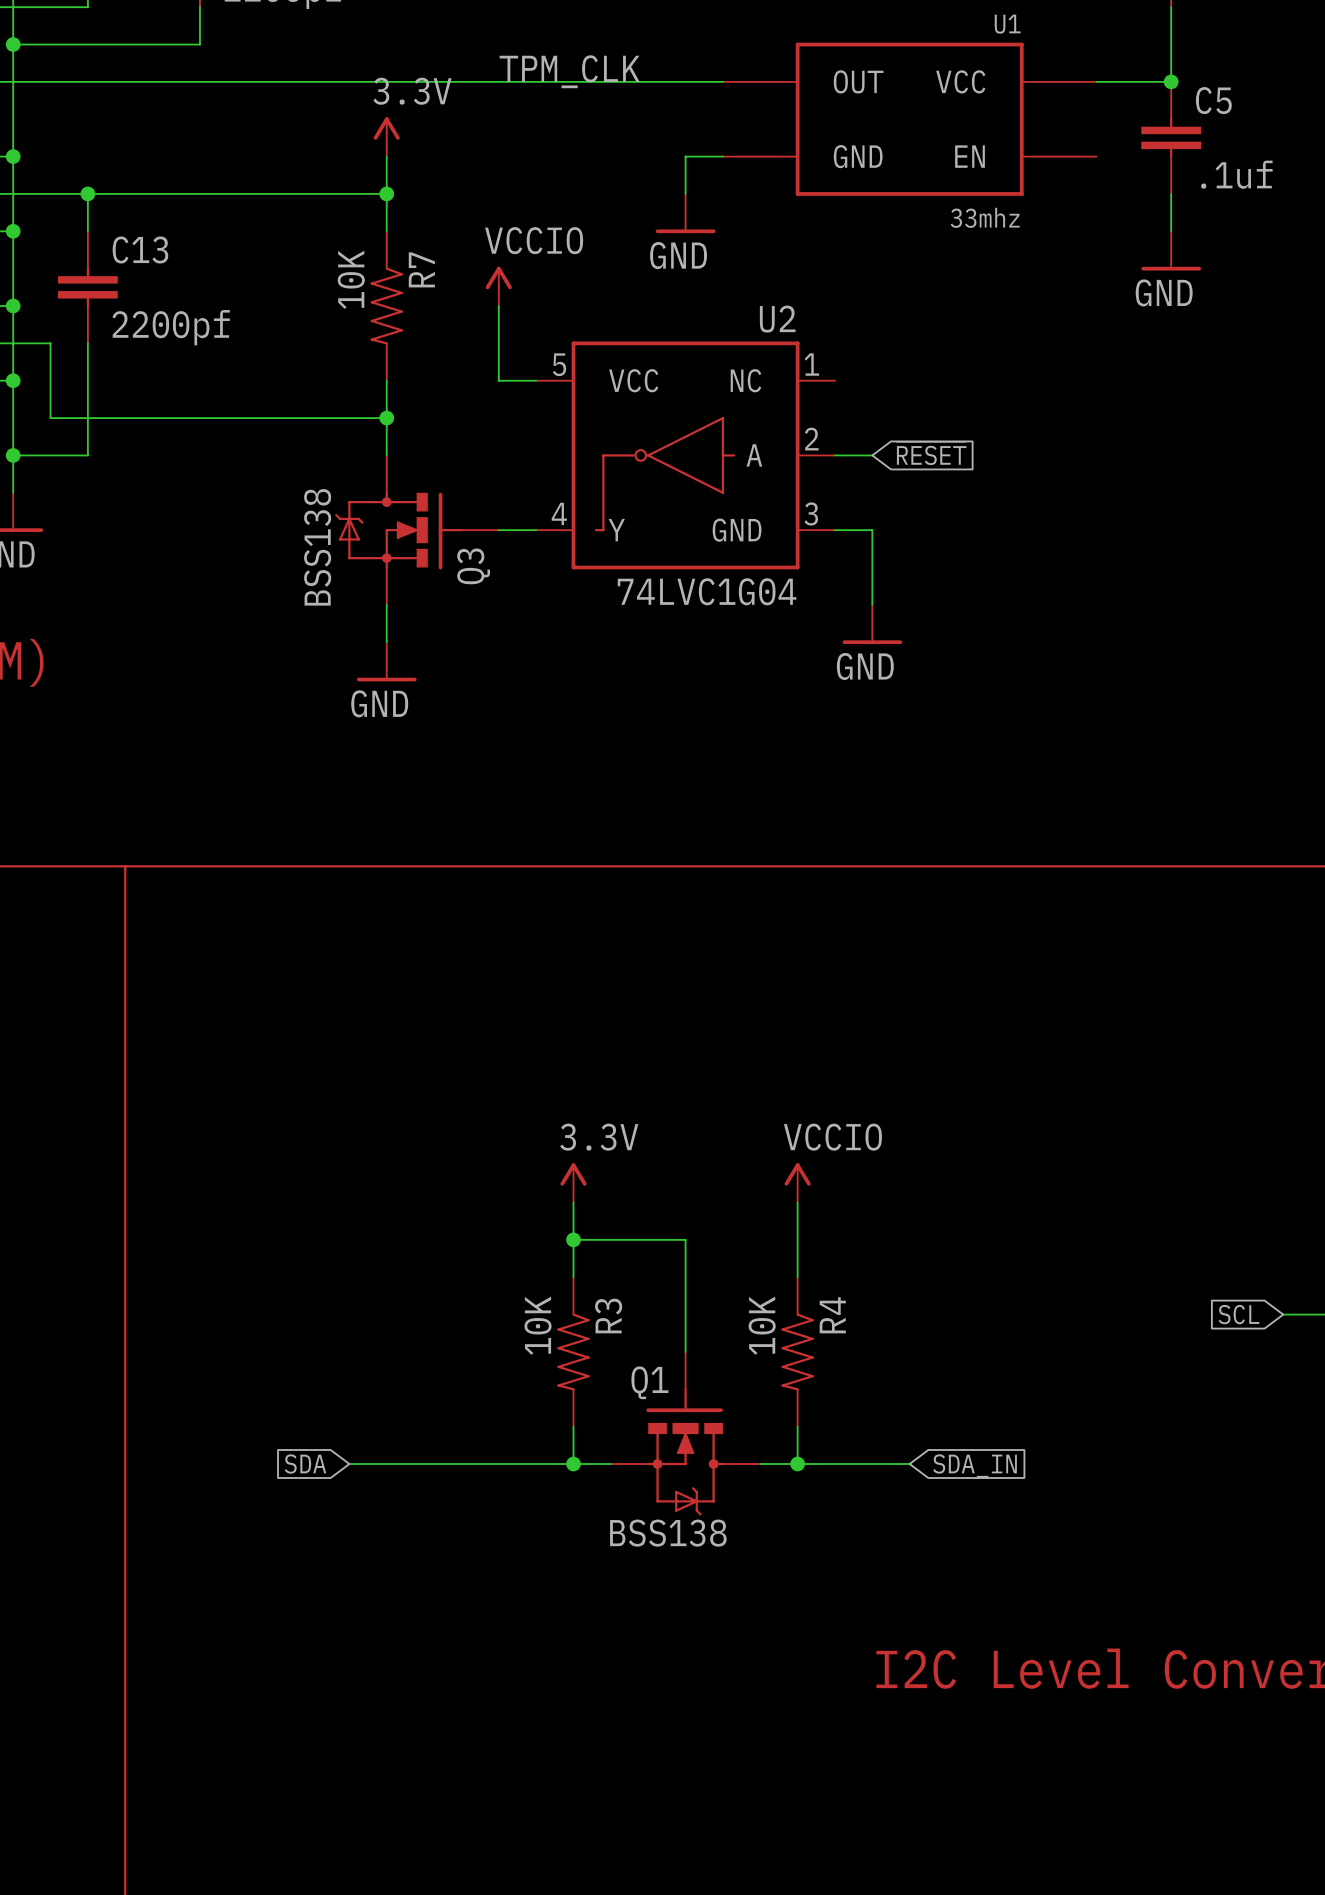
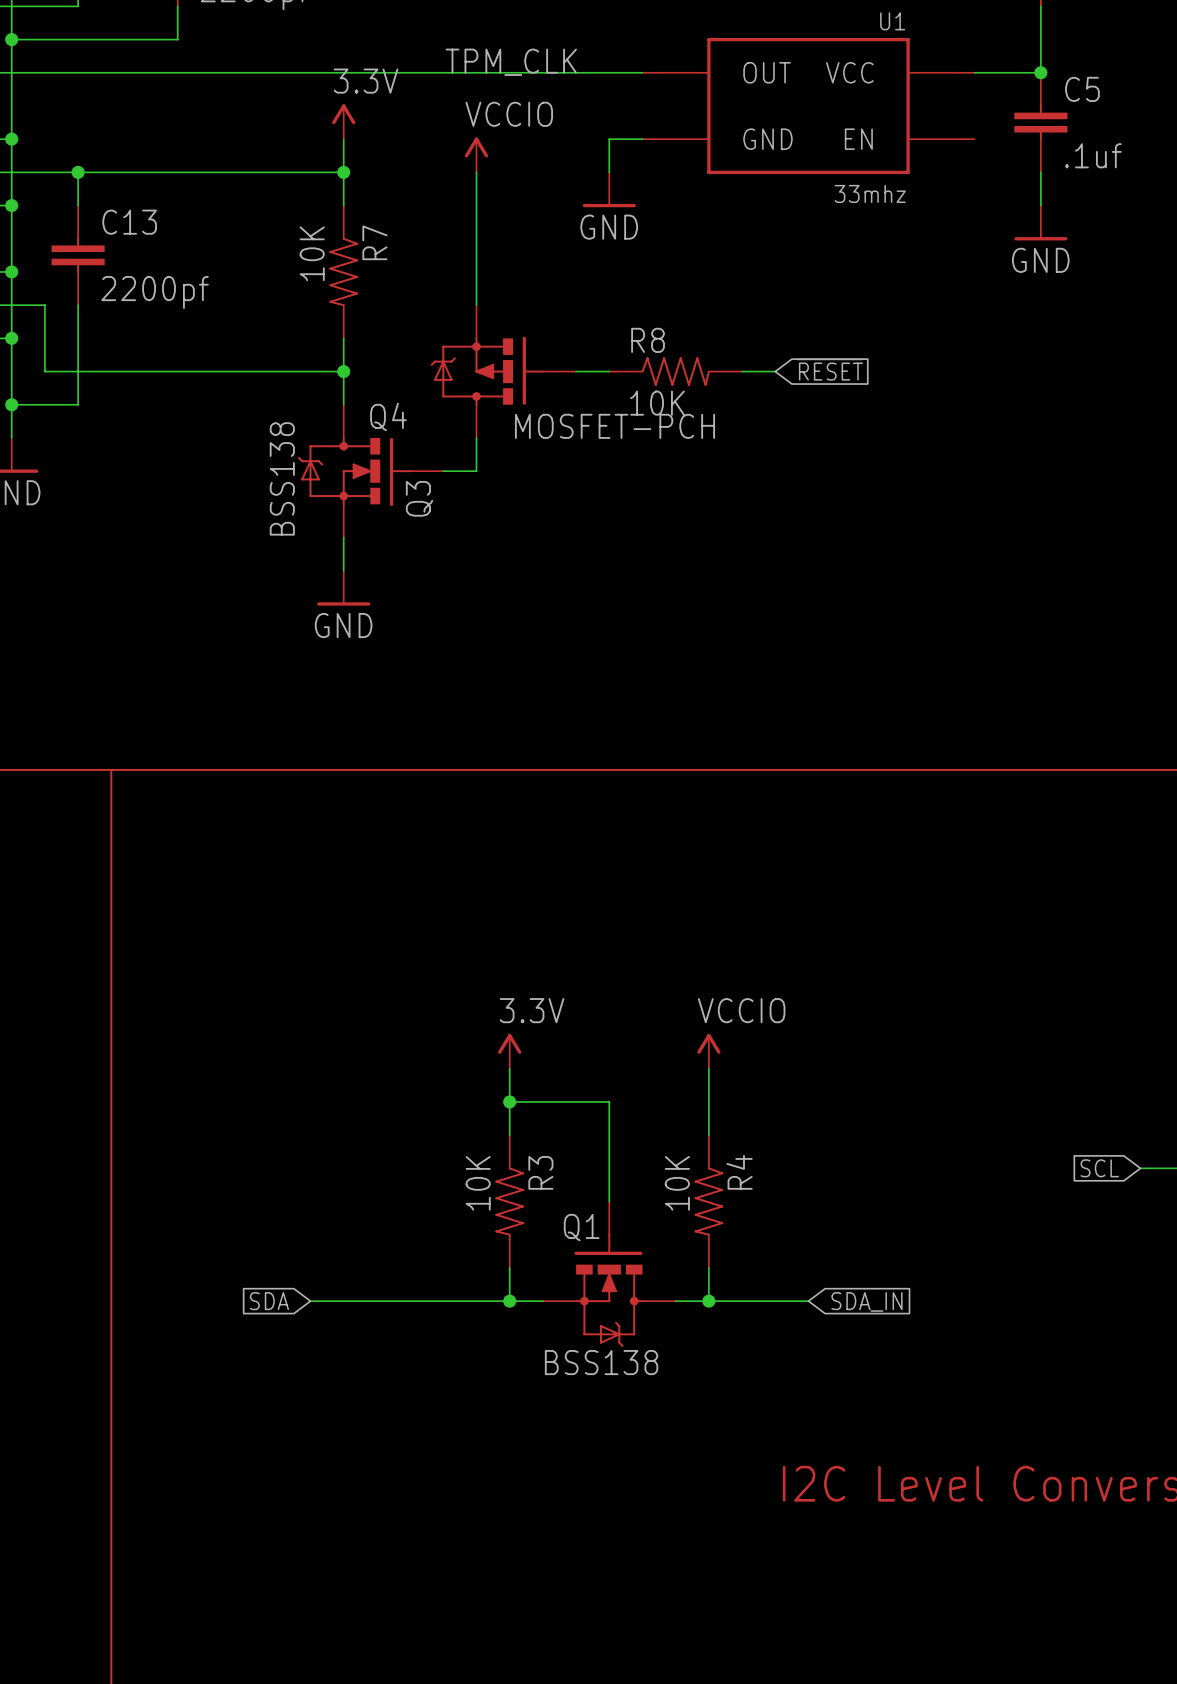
wire: none -> (476, 172) (476, 305)
power symbol position: VCCIO (498, 286) -> VCCIO (476, 154)
wire: (498, 306) (498, 380) (536, 380) -> none
Q4: none -> MOSFET-PCH (503, 371)
wire: none -> (576, 371) (609, 371)
R8: none -> 10K (675, 371)
global label position: ~{RESET} (931, 453) -> ~{RESET} (829, 369)
U2: 74LVC1G04 (685, 455) -> none
wire: (834, 455) (872, 455) -> (742, 371) (775, 371)
wire: none -> (476, 437) (476, 471)
wire: (834, 530) (872, 530) (872, 604) -> none
power symbol: GND (872, 624) -> none

